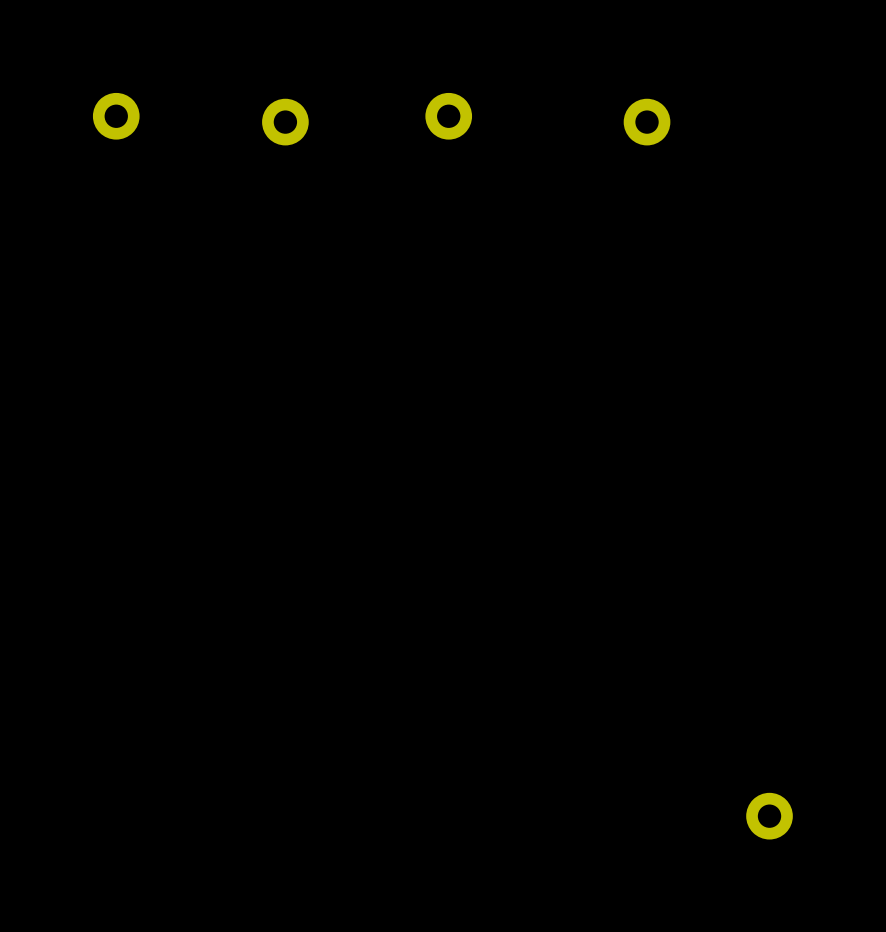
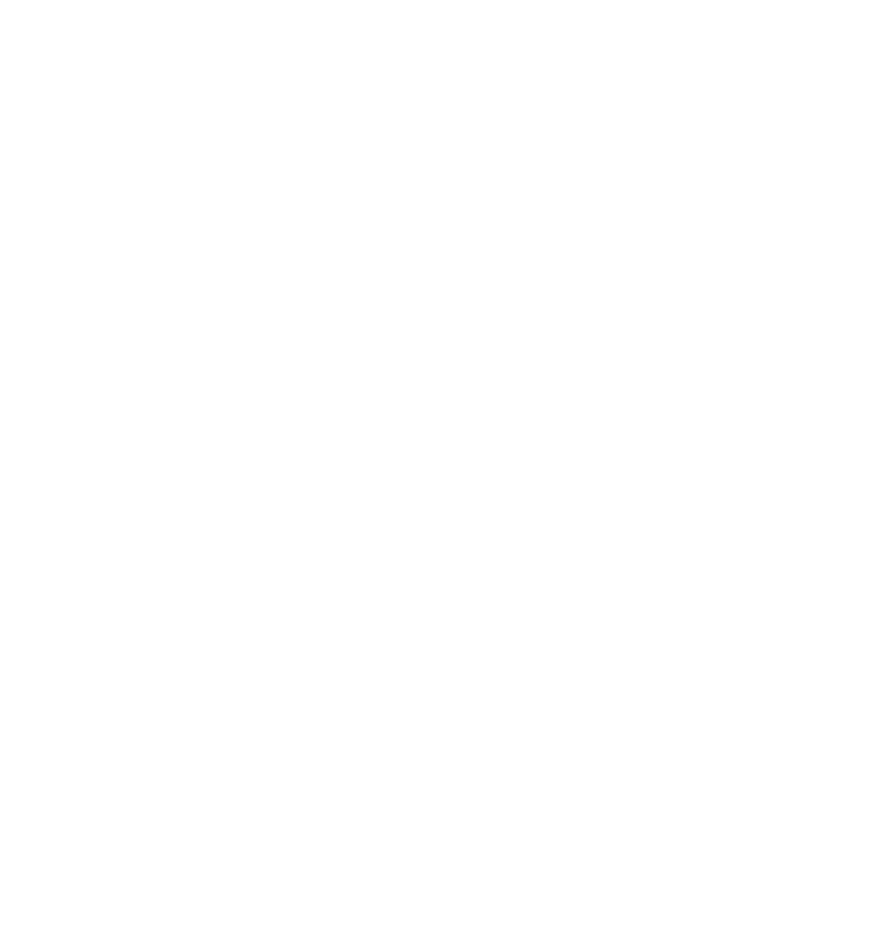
part: (116, 116) -> none
part: (448, 116) -> none
part: (285, 122) -> none
part: (647, 122) -> none
part: (769, 816) -> none

